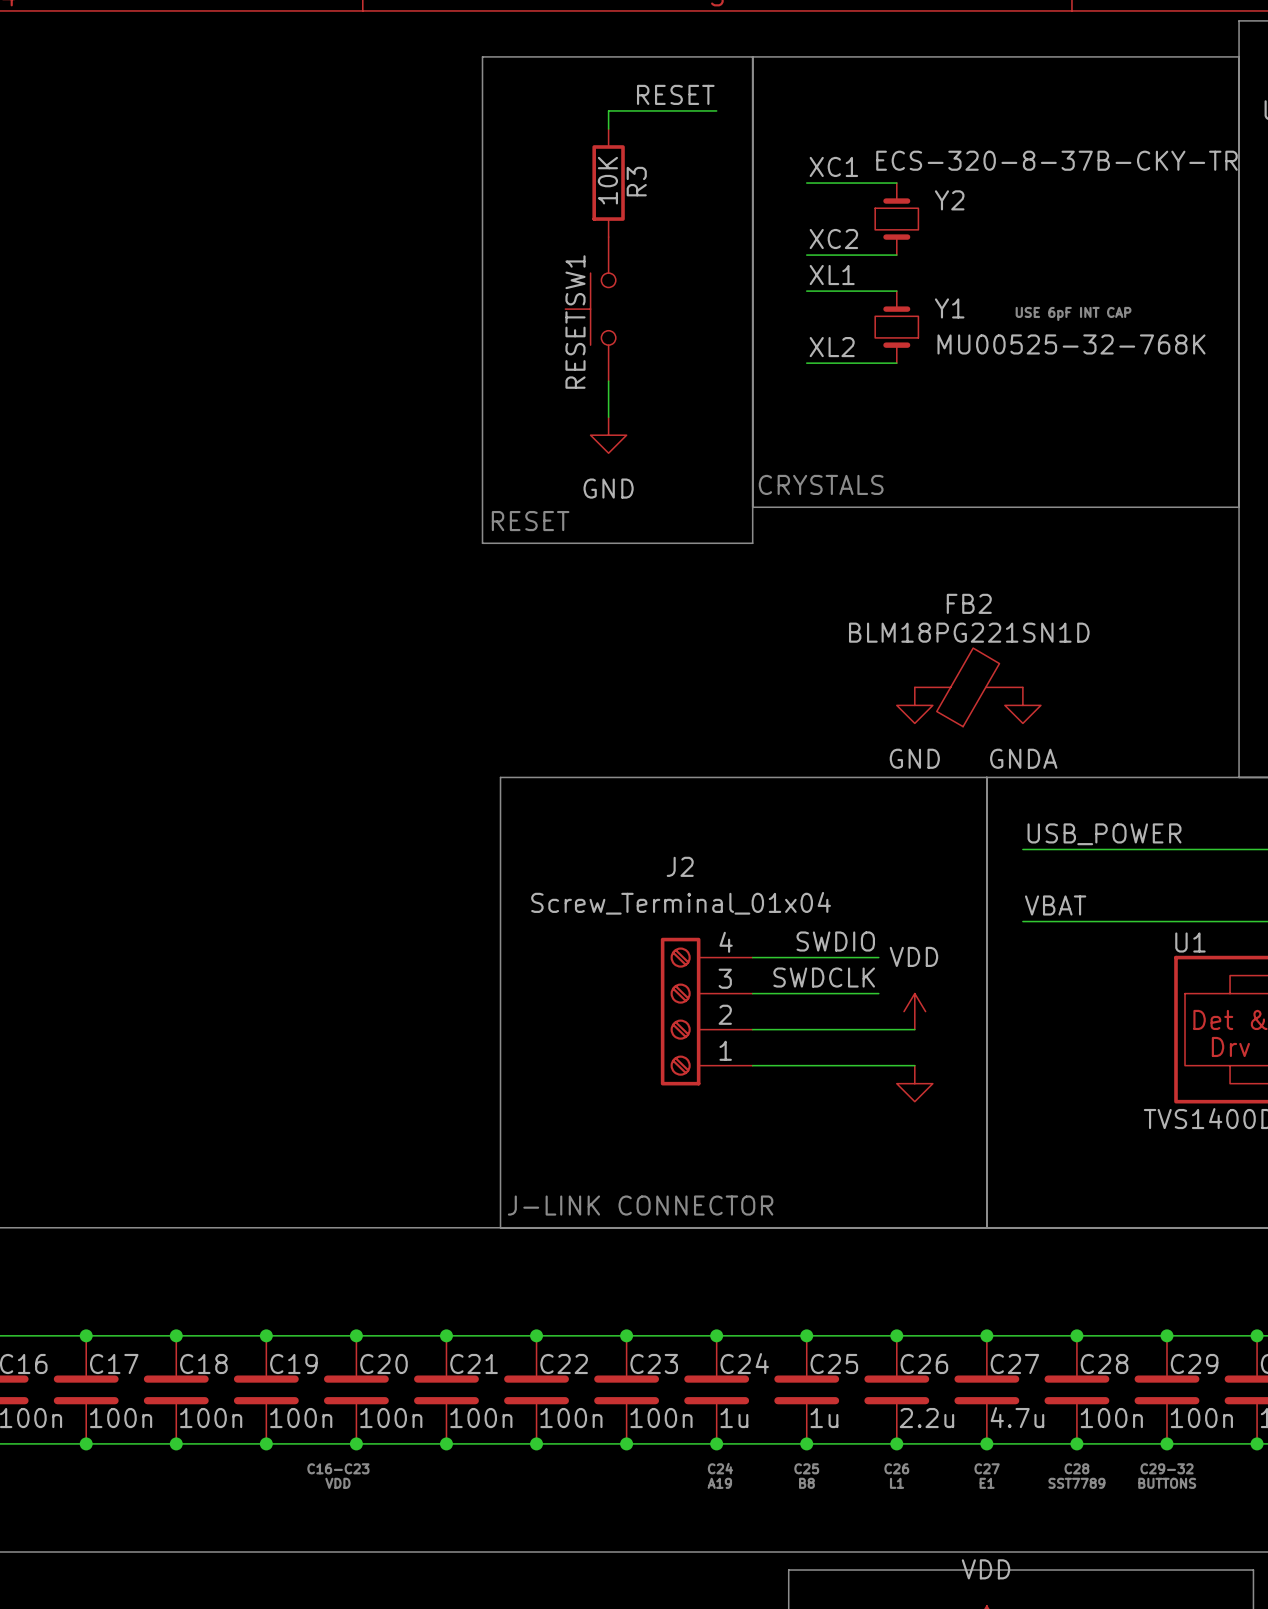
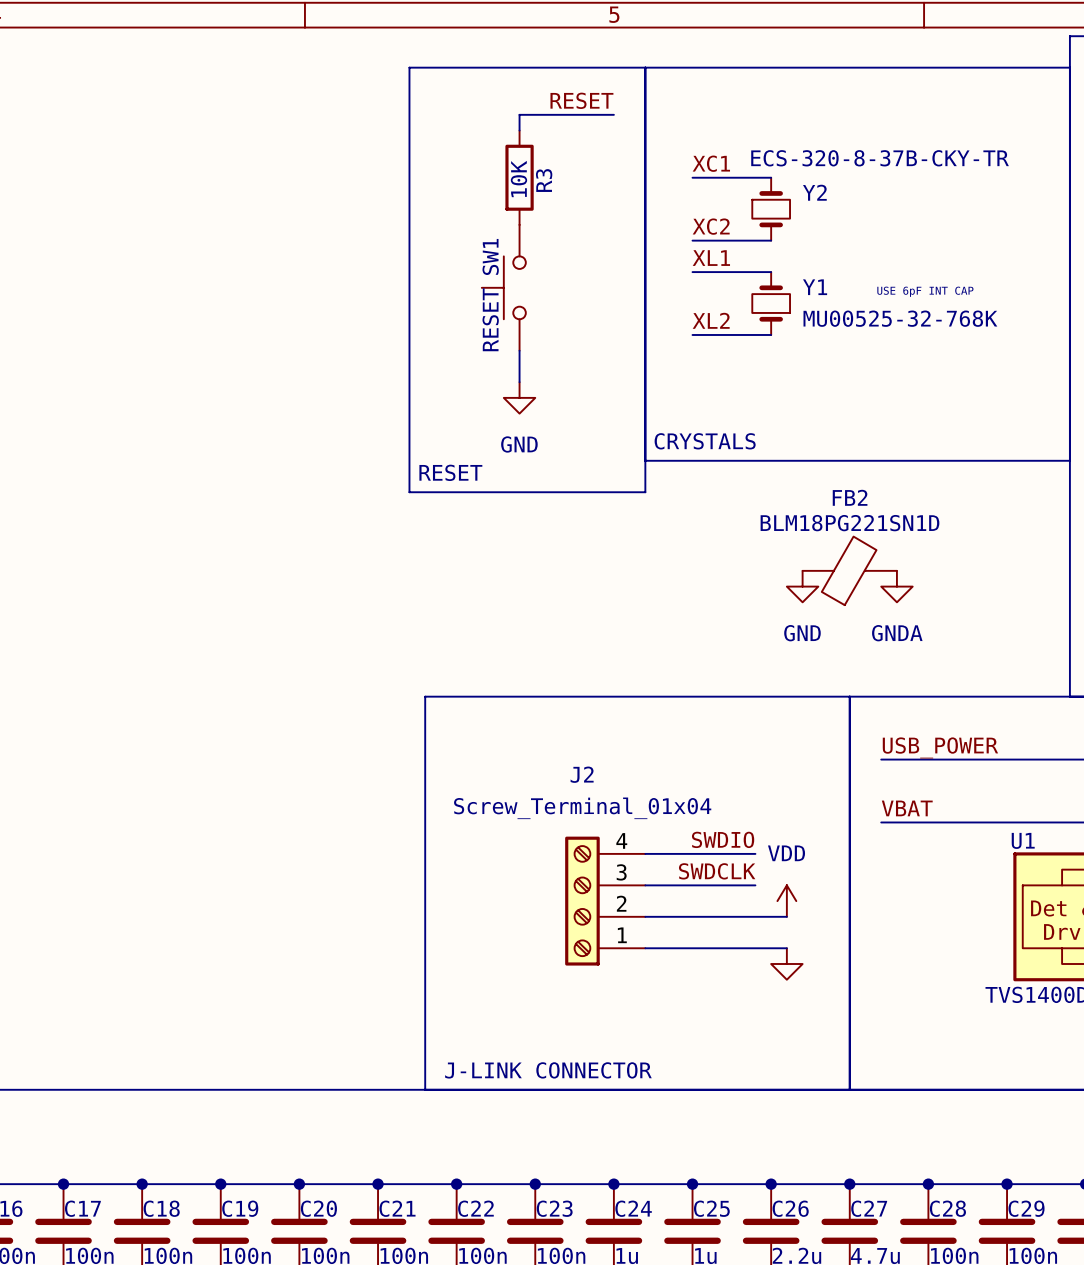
FB2 position: (968, 687) -> (849, 570)
power symbol position: GND (914, 705) -> GND (802, 586)
power symbol position: GNDA (1022, 705) -> GNDA (896, 586)

